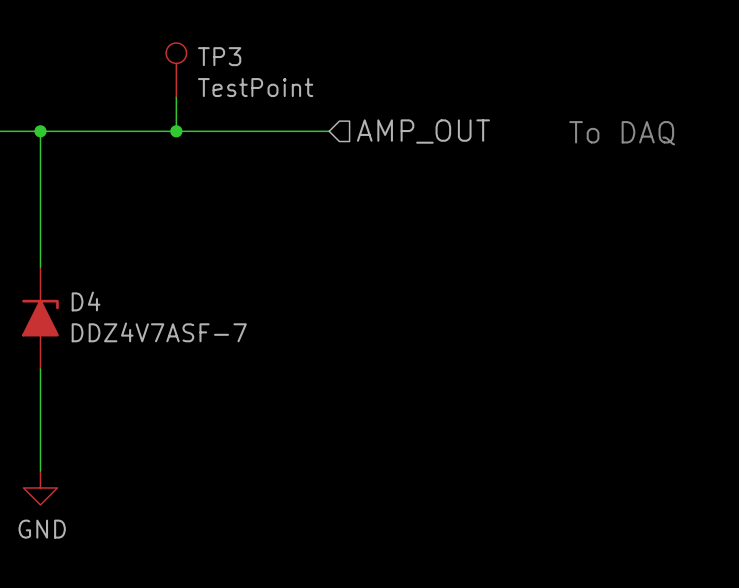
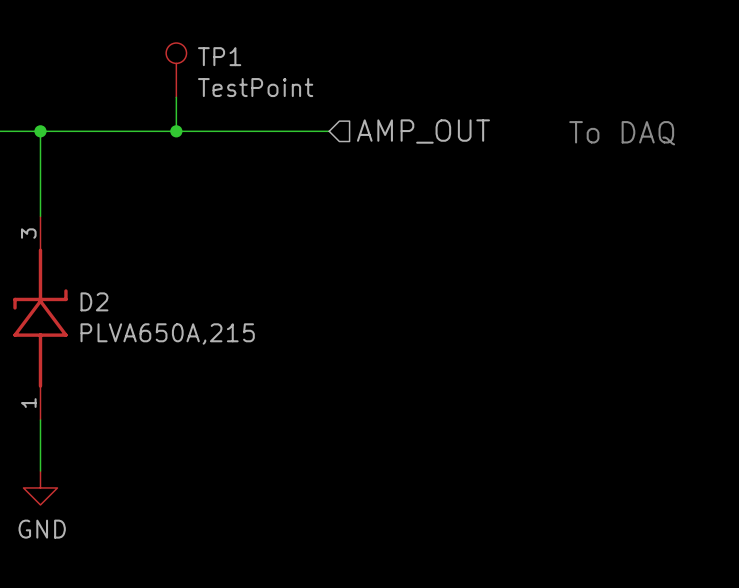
TP3 name: TP3 (219, 56) -> TP1 (219, 56)
D4: DDZ4V7ASF-7 (40, 318) -> none
D2: none -> PLVA650A,215 (40, 318)

